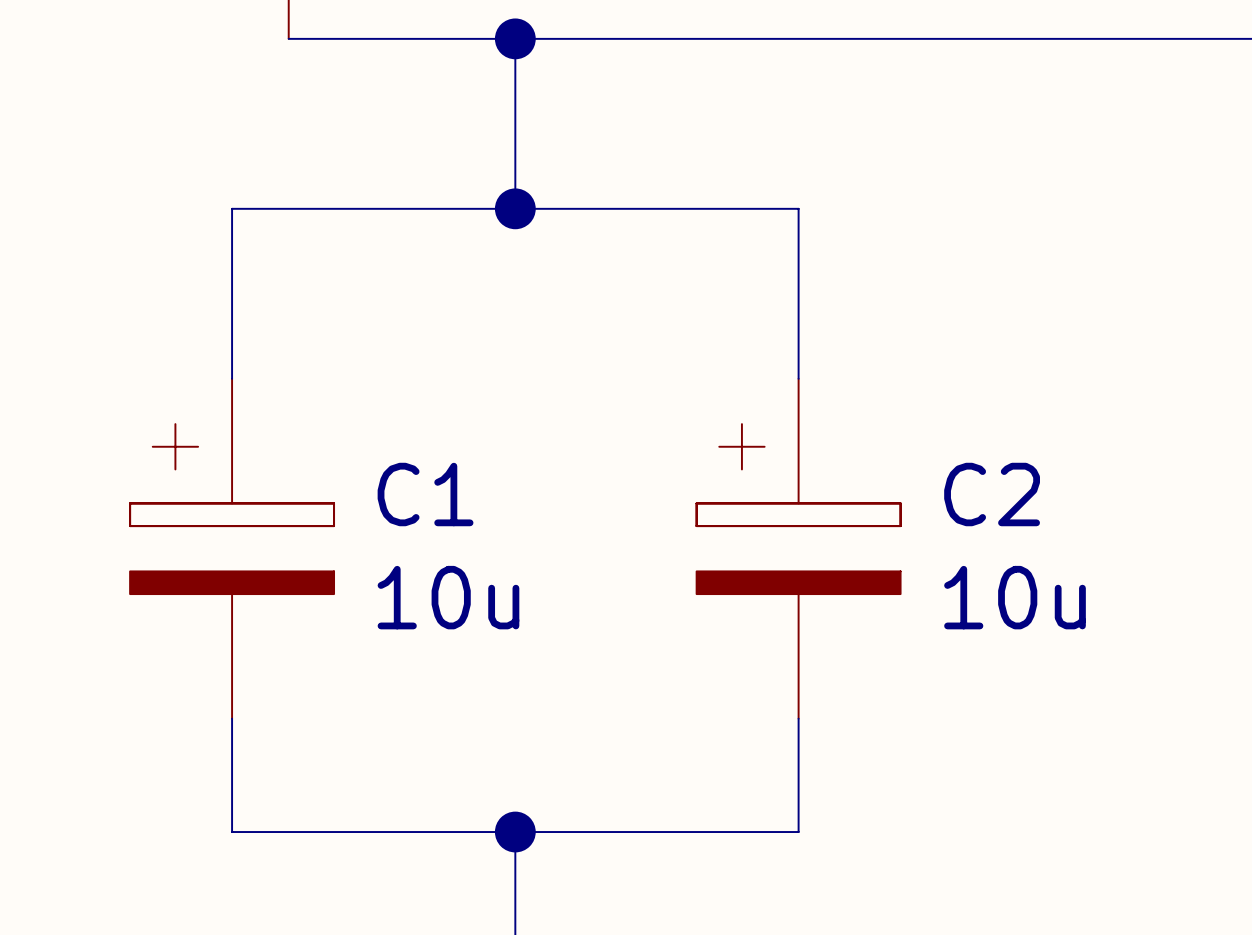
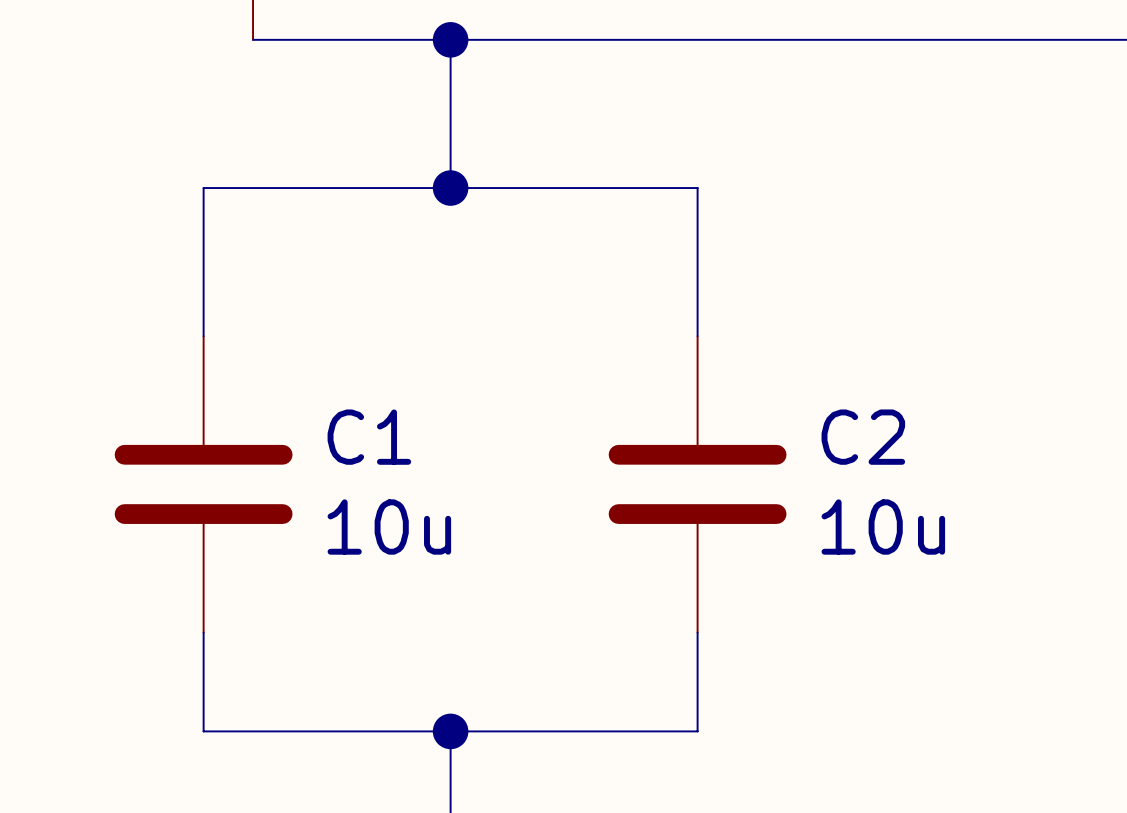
C1 symbol: [130, 378, 335, 719] -> [114, 336, 293, 633]
C2 symbol: [696, 378, 901, 719] -> [608, 336, 787, 633]

